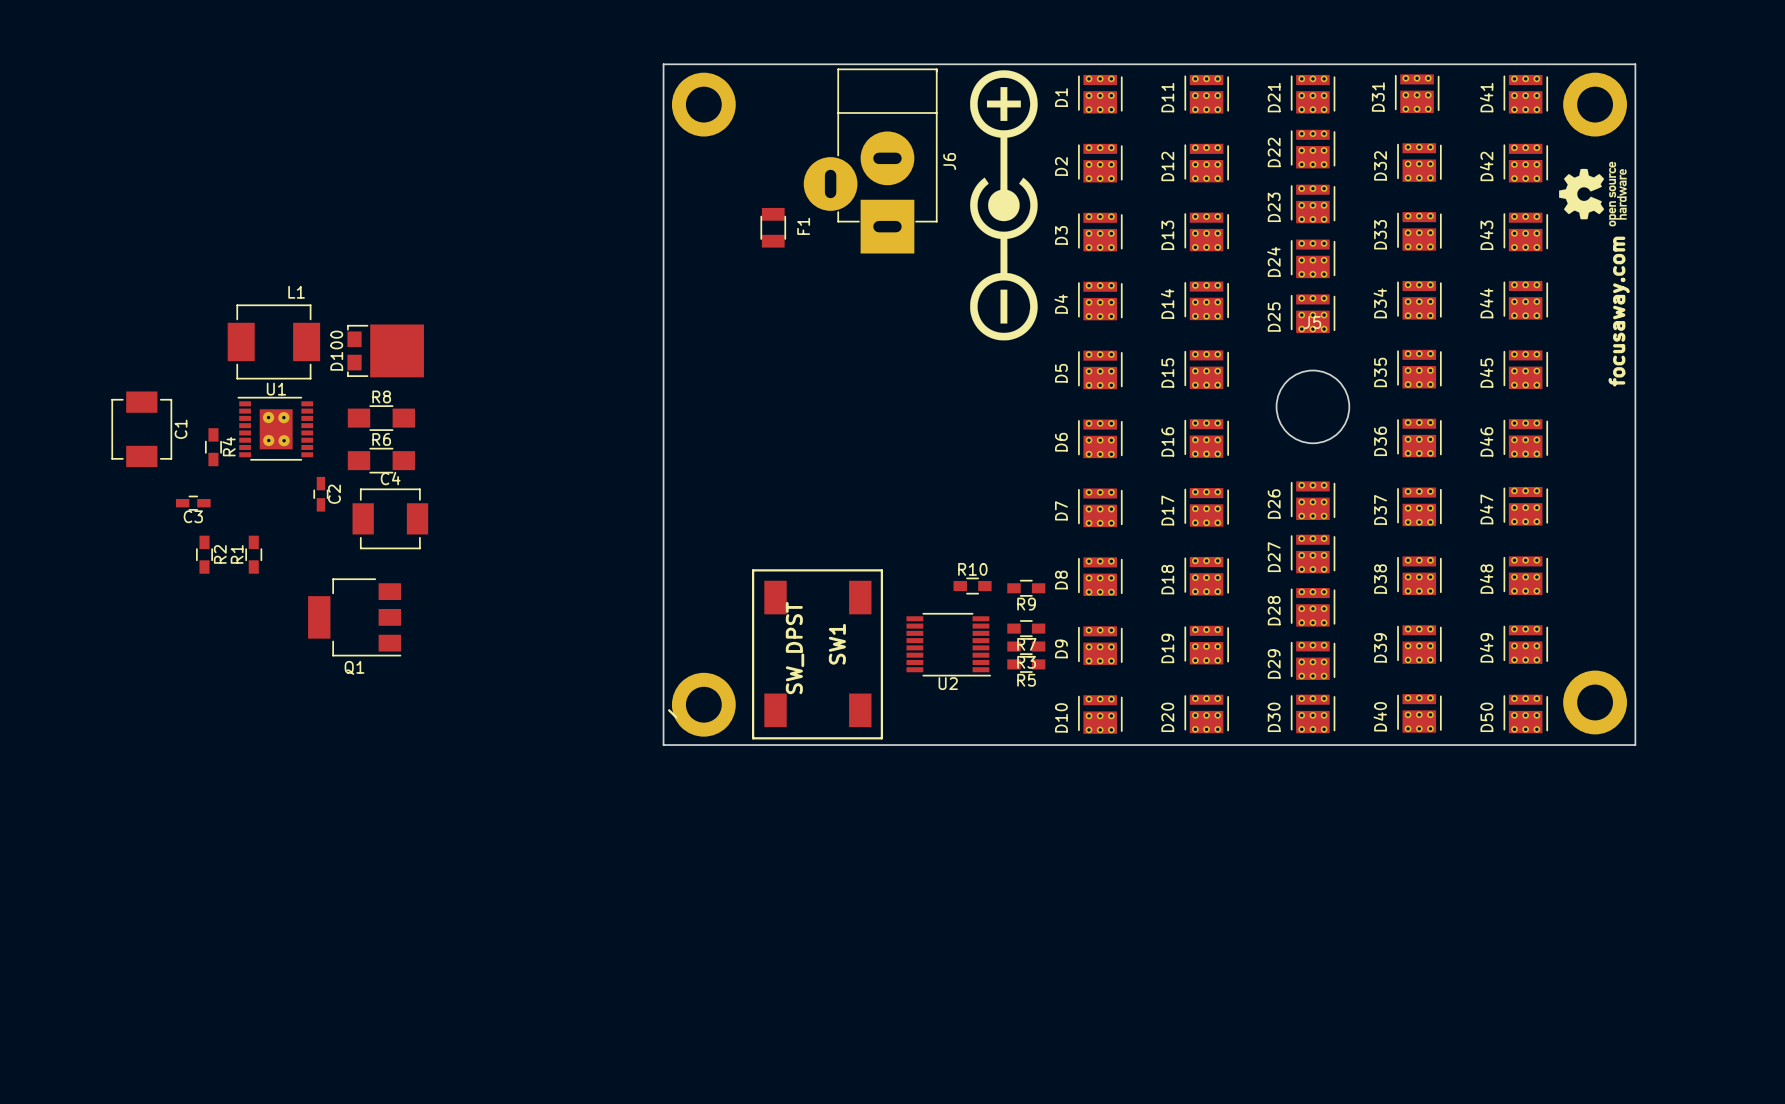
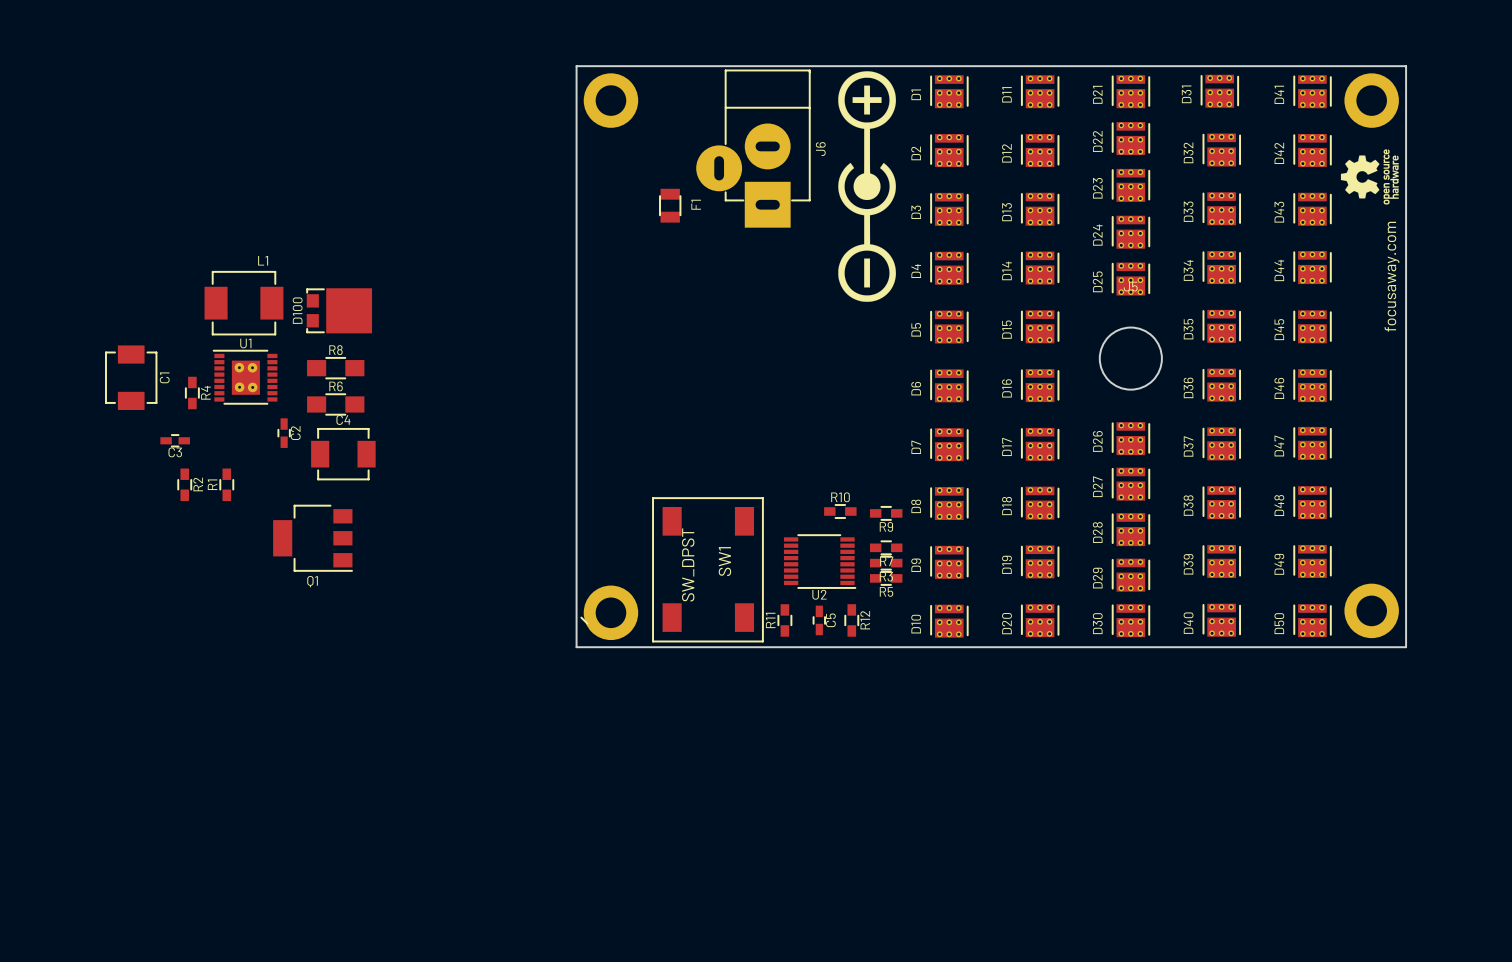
R11: none -> (784, 620)
C5: none -> (819, 620)
R12: none -> (851, 620)

